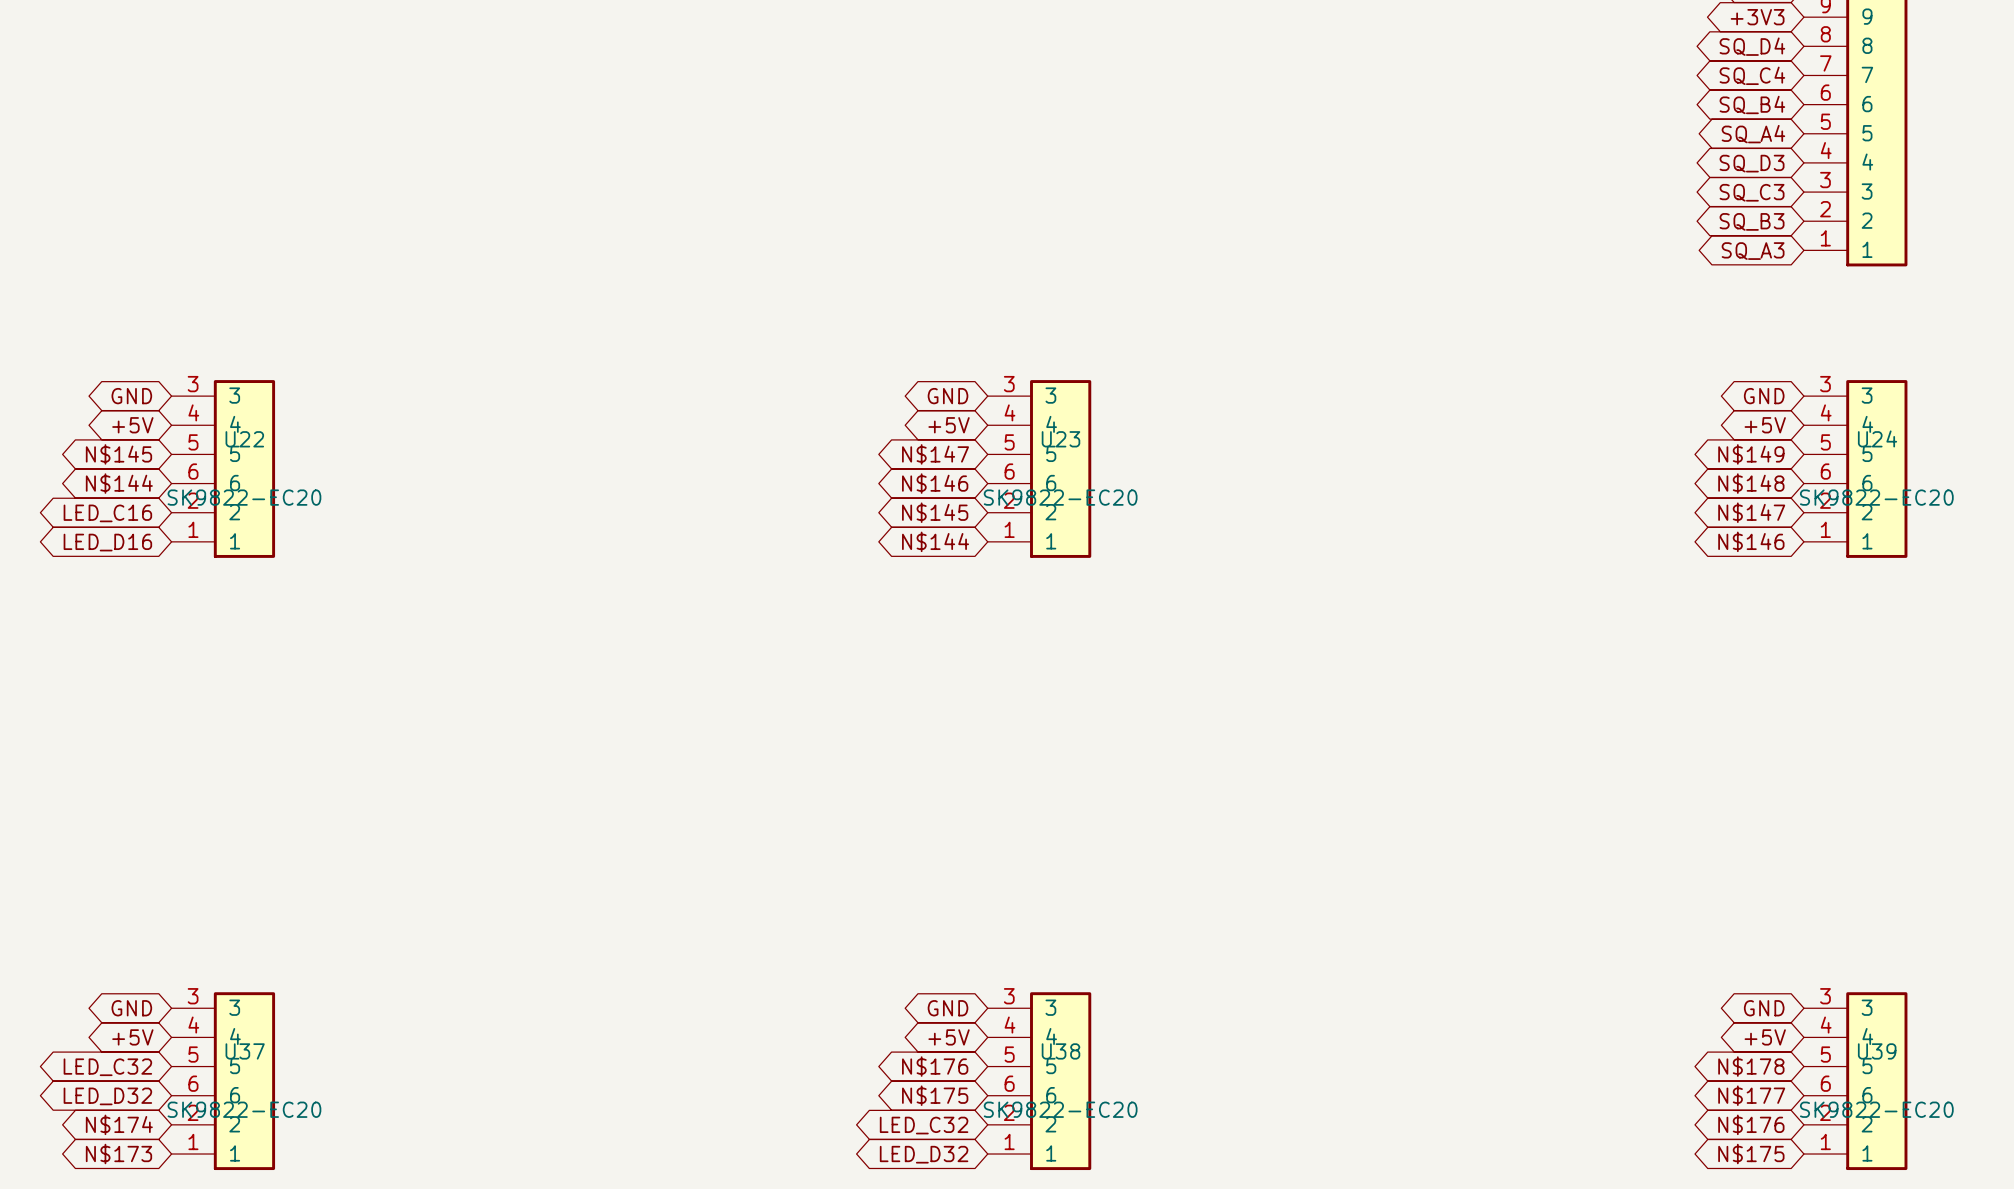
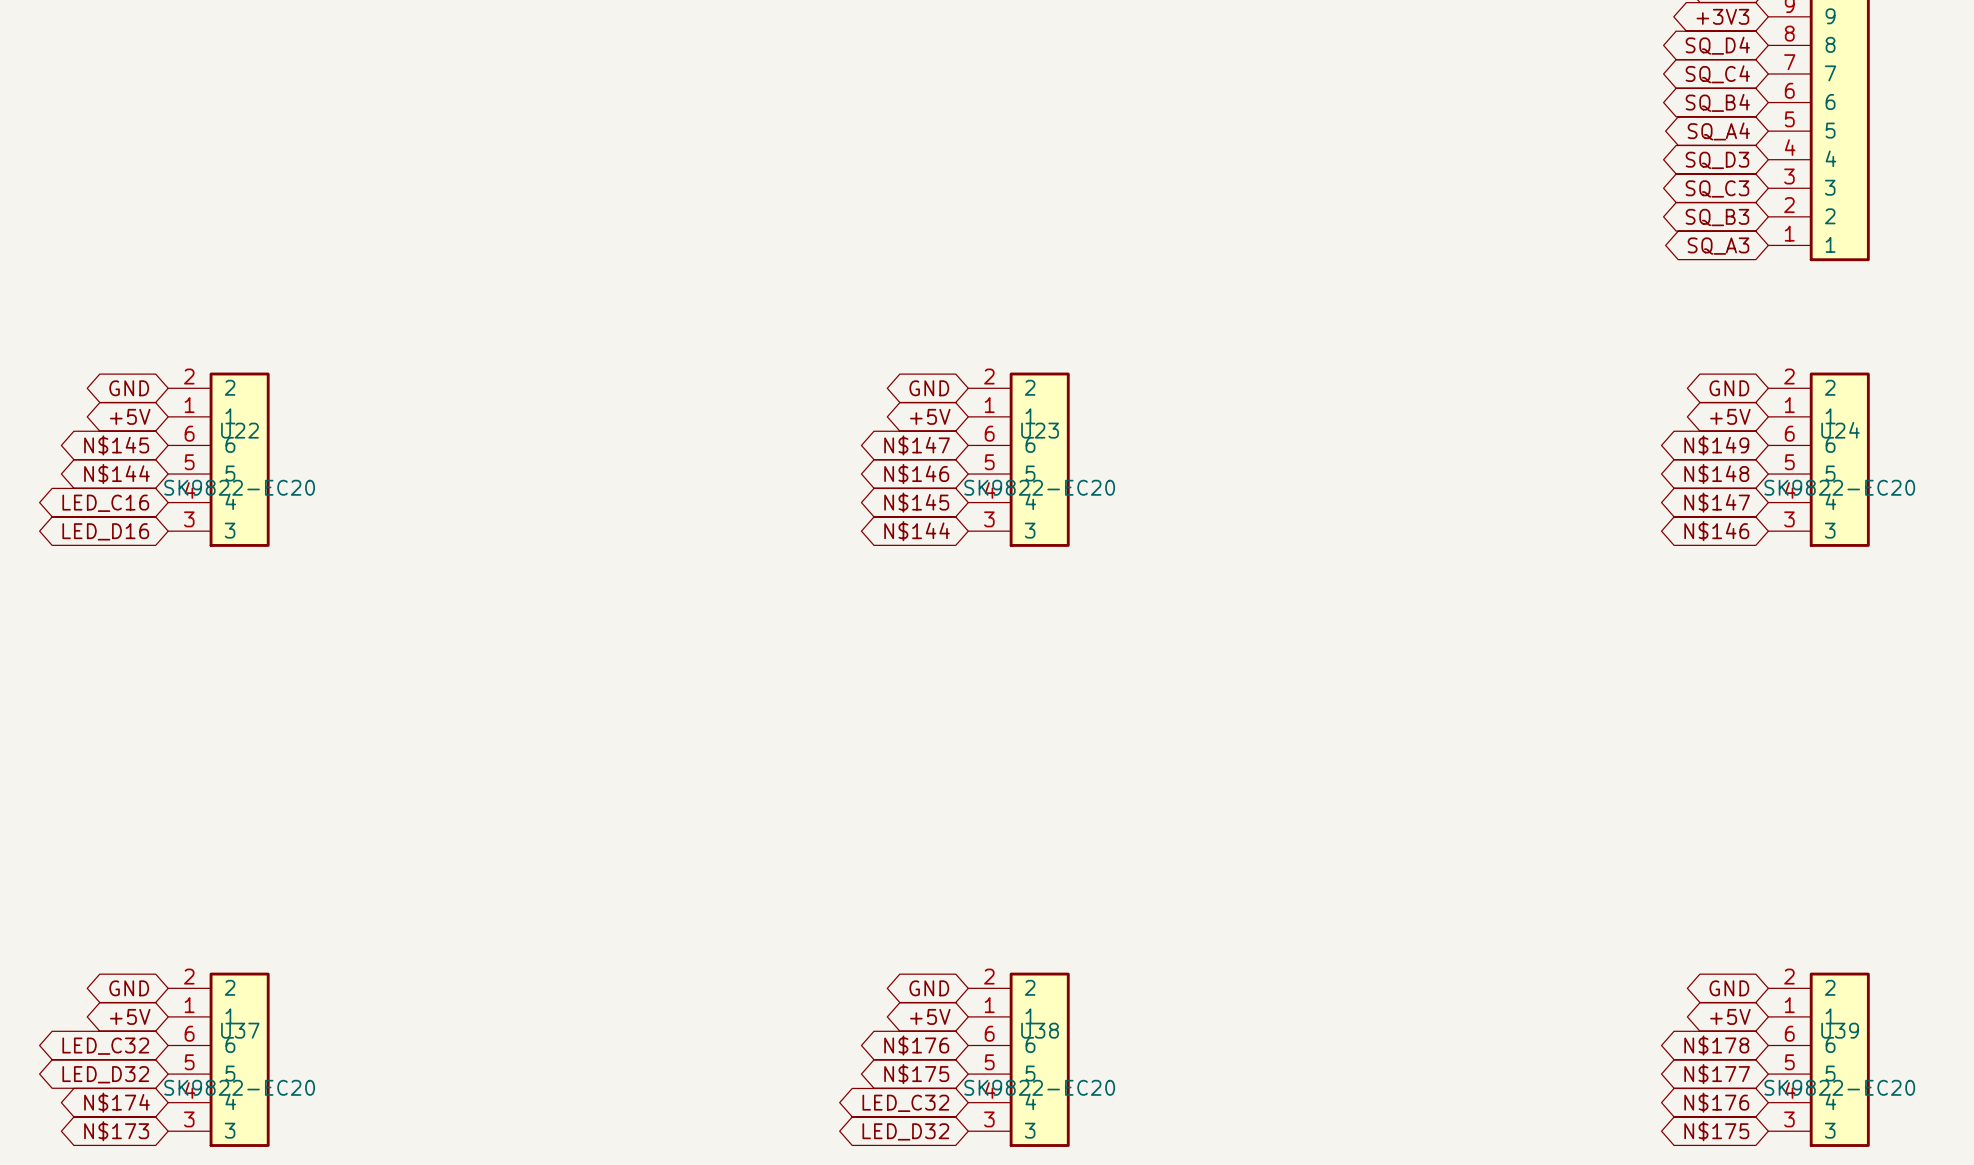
U22 symbol: [171, 380, 276, 558] -> [168, 372, 270, 547]
U23 symbol: [987, 380, 1092, 558] -> [968, 372, 1070, 547]
U24 symbol: [1803, 380, 1908, 558] -> [1768, 372, 1870, 547]
U37 symbol: [171, 992, 276, 1171] -> [168, 972, 270, 1147]
U38 symbol: [987, 992, 1092, 1171] -> [968, 972, 1070, 1147]
U39 symbol: [1803, 992, 1908, 1171] -> [1768, 972, 1870, 1147]

